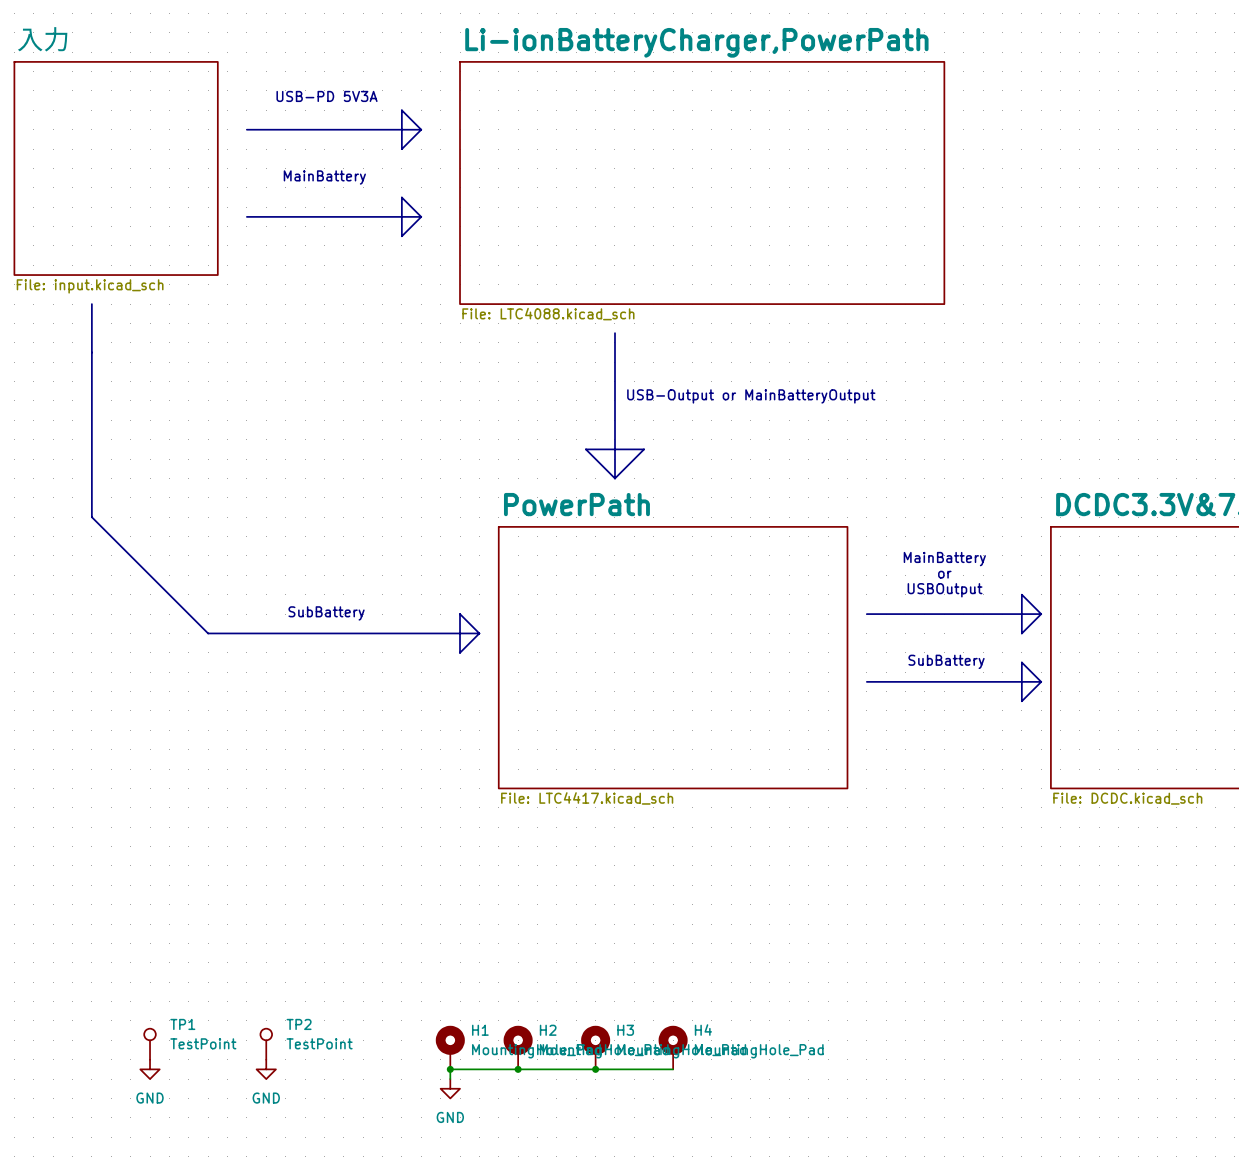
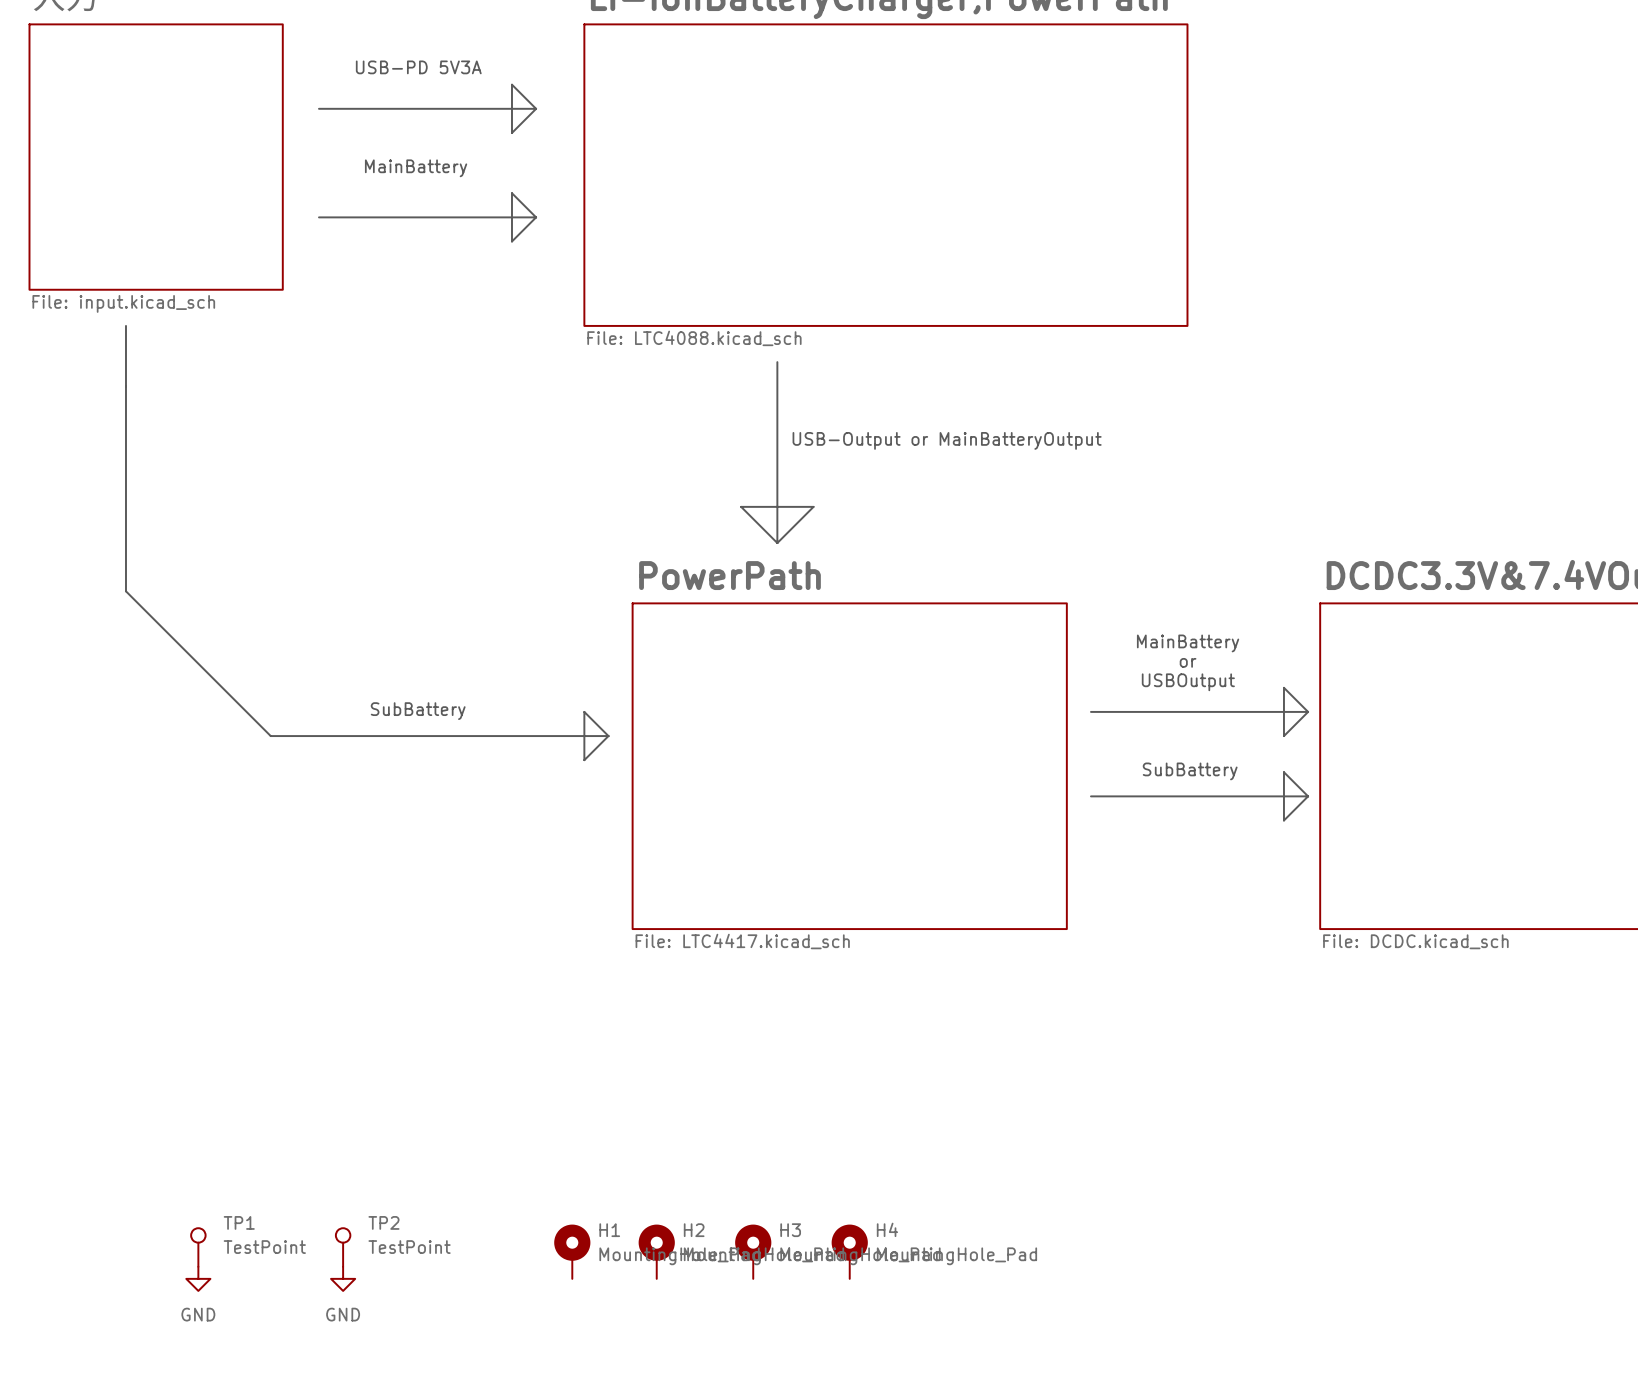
junction: (450, 1069) -> none
junction: (518, 1069) -> none
junction: (595, 1069) -> none
wire: (673, 1069) (450, 1069) (450, 1079) -> none
power symbol: GND (450, 1088) -> none

